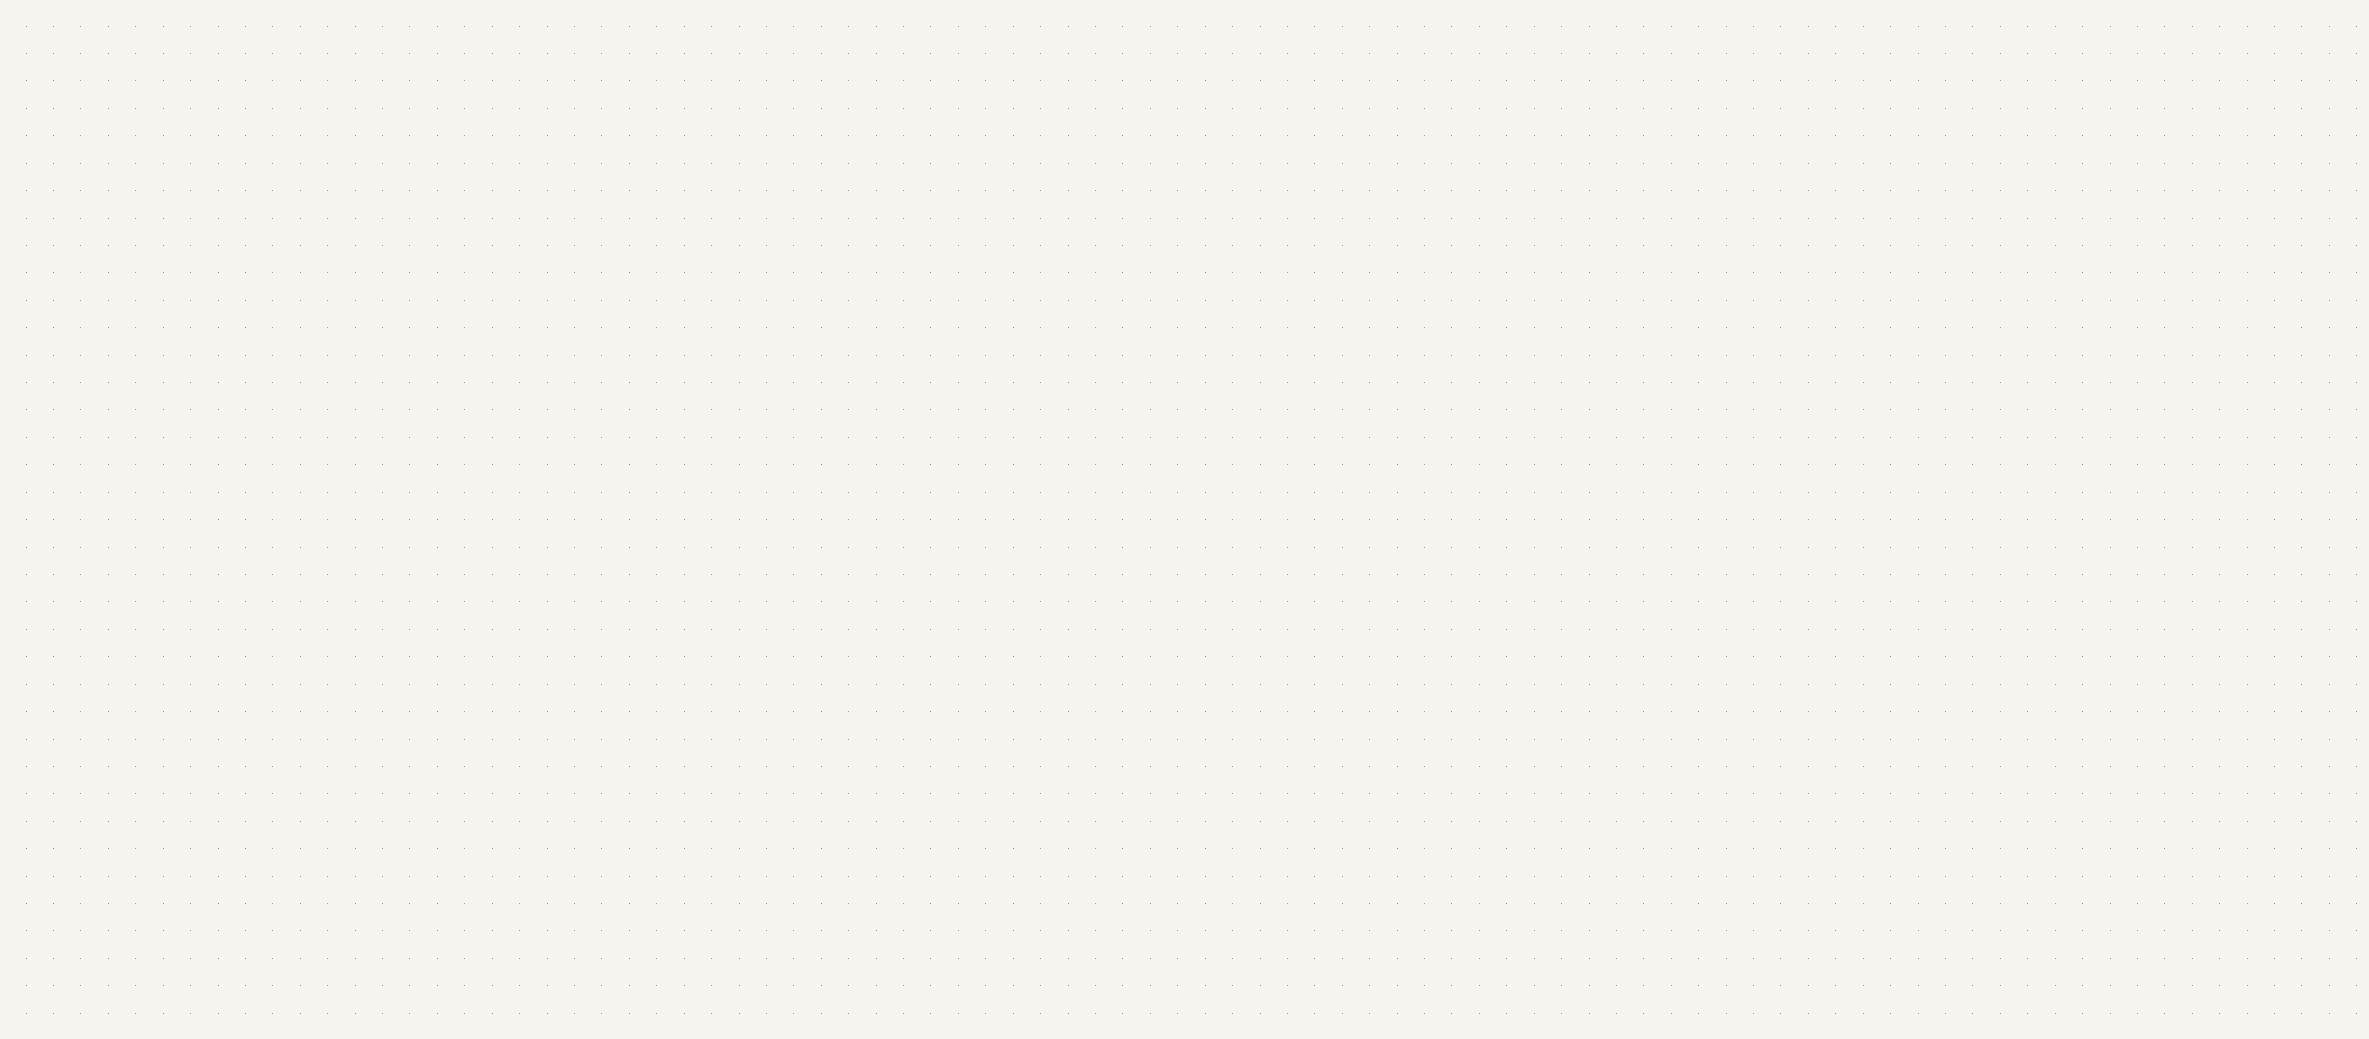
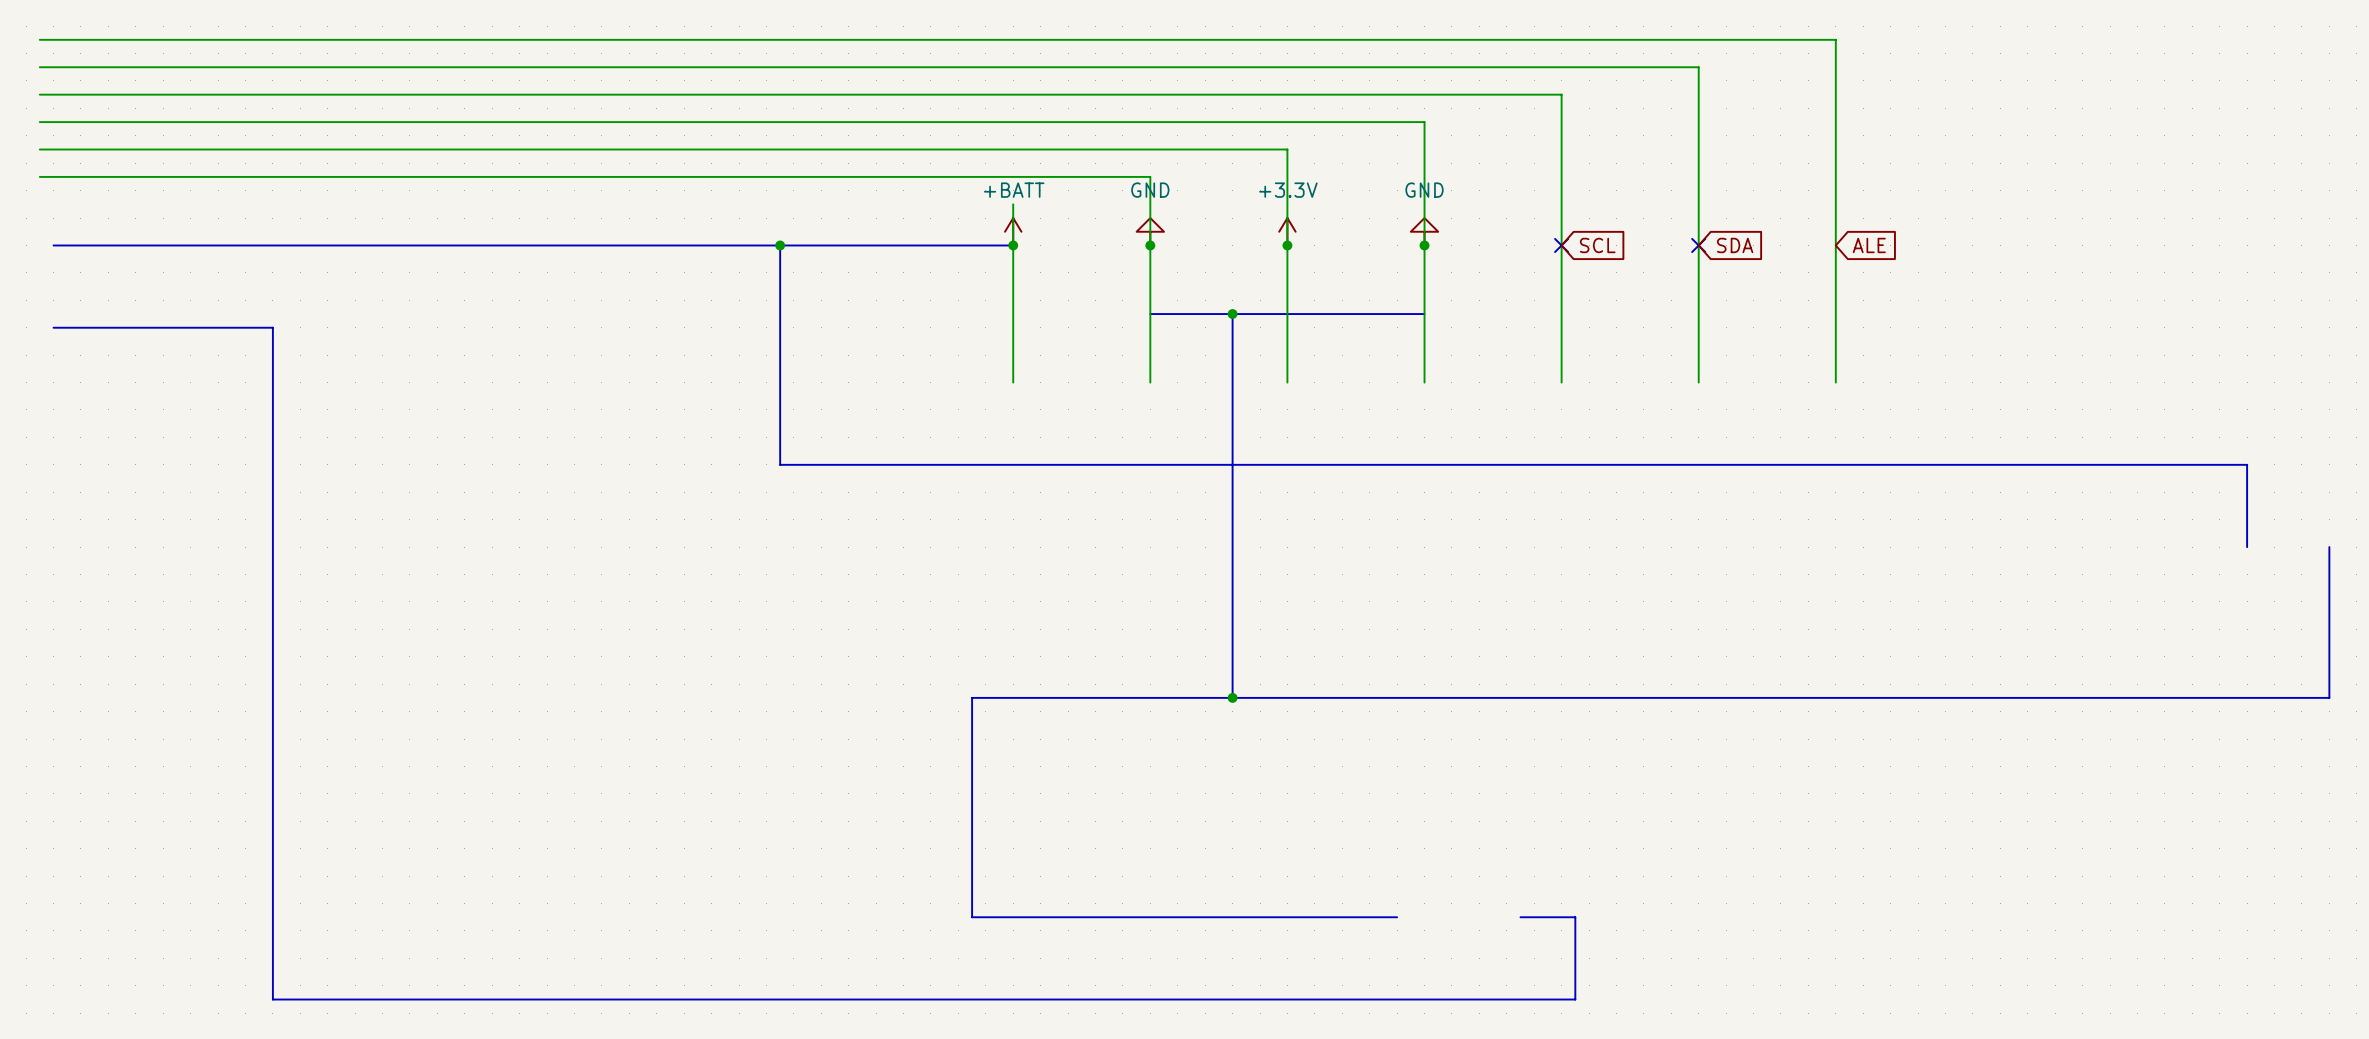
wire: none -> (39, 39) (1835, 39) (1835, 382)
wire: none -> (39, 67) (1698, 67) (1698, 382)
wire: none -> (39, 94) (1561, 94) (1561, 382)
wire: none -> (39, 122) (1424, 122) (1424, 382)
wire: none -> (39, 149) (1287, 149) (1287, 382)
wire: none -> (39, 176) (1150, 176) (1150, 382)
wire: none -> (1013, 204) (1013, 382)
power symbol: none -> +BATT (1013, 231)
power symbol: none -> GND (1150, 231)
power symbol: none -> +3.3V (1287, 231)
power symbol: none -> GND (1424, 231)
bus: none -> (53, 245) (1013, 245)
bus: none -> (780, 245) (780, 464) (2247, 464) (2247, 547)
junction: none -> (780, 245)
junction: none -> (1013, 245)
junction: none -> (1150, 245)
junction: none -> (1287, 245)
junction: none -> (1424, 245)
no-connect mark: none -> (1561, 245)
global label: none -> SCL (1597, 245)
no-connect mark: none -> (1698, 245)
global label: none -> SDA (1735, 245)
global label: none -> ALE (1869, 245)
bus: none -> (1150, 314) (1424, 314)
bus: none -> (1232, 314) (1232, 697)
junction: none -> (1232, 314)
bus: none -> (53, 327) (272, 327) (272, 999) (1575, 999) (1575, 917) (1520, 917)
bus: none -> (2329, 547) (2329, 697) (972, 697) (972, 917) (1397, 917)
junction: none -> (1232, 697)

